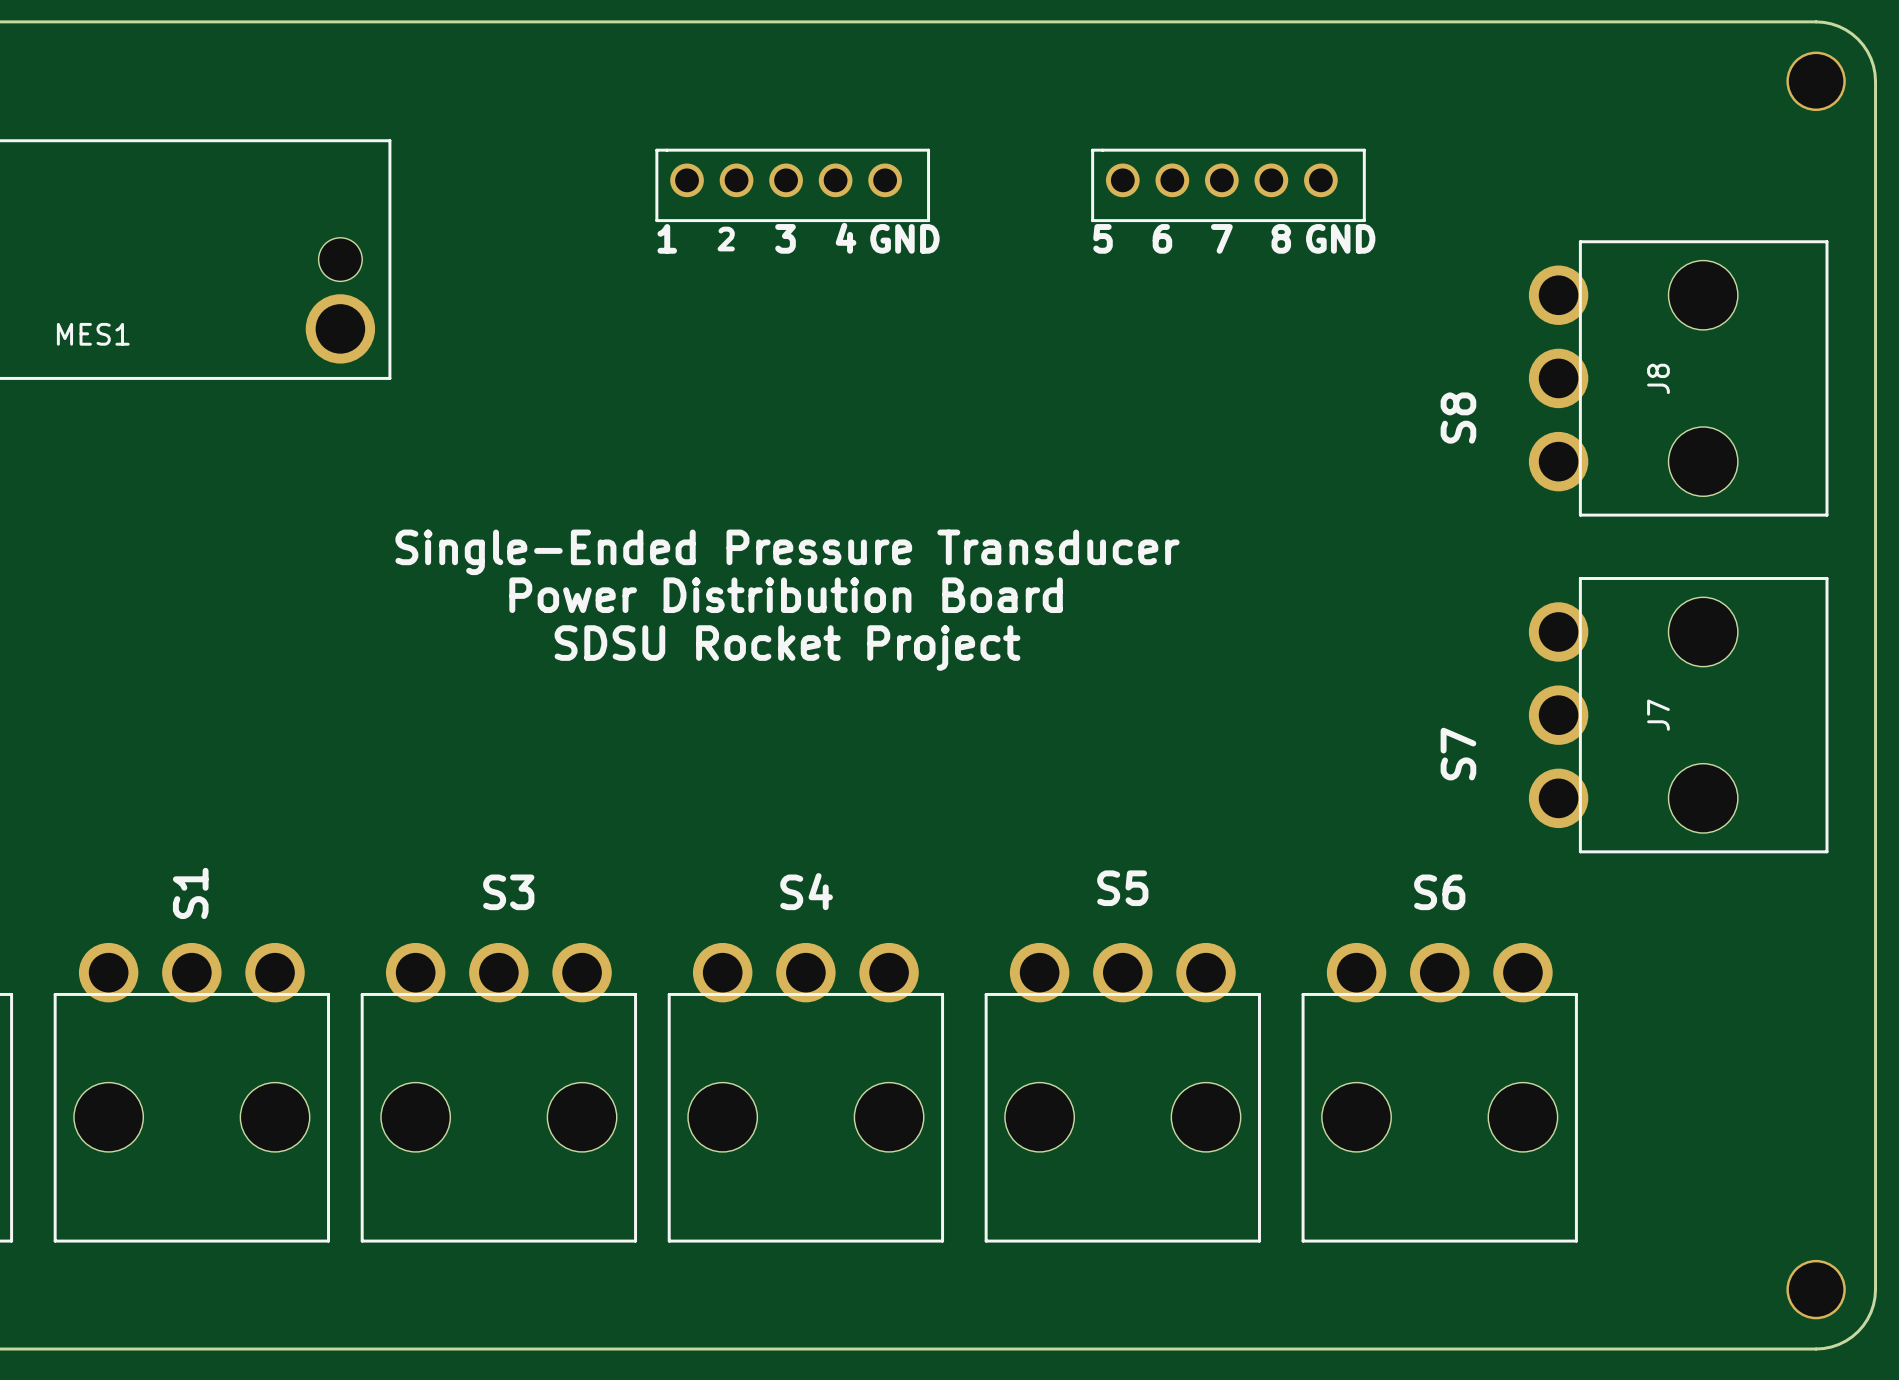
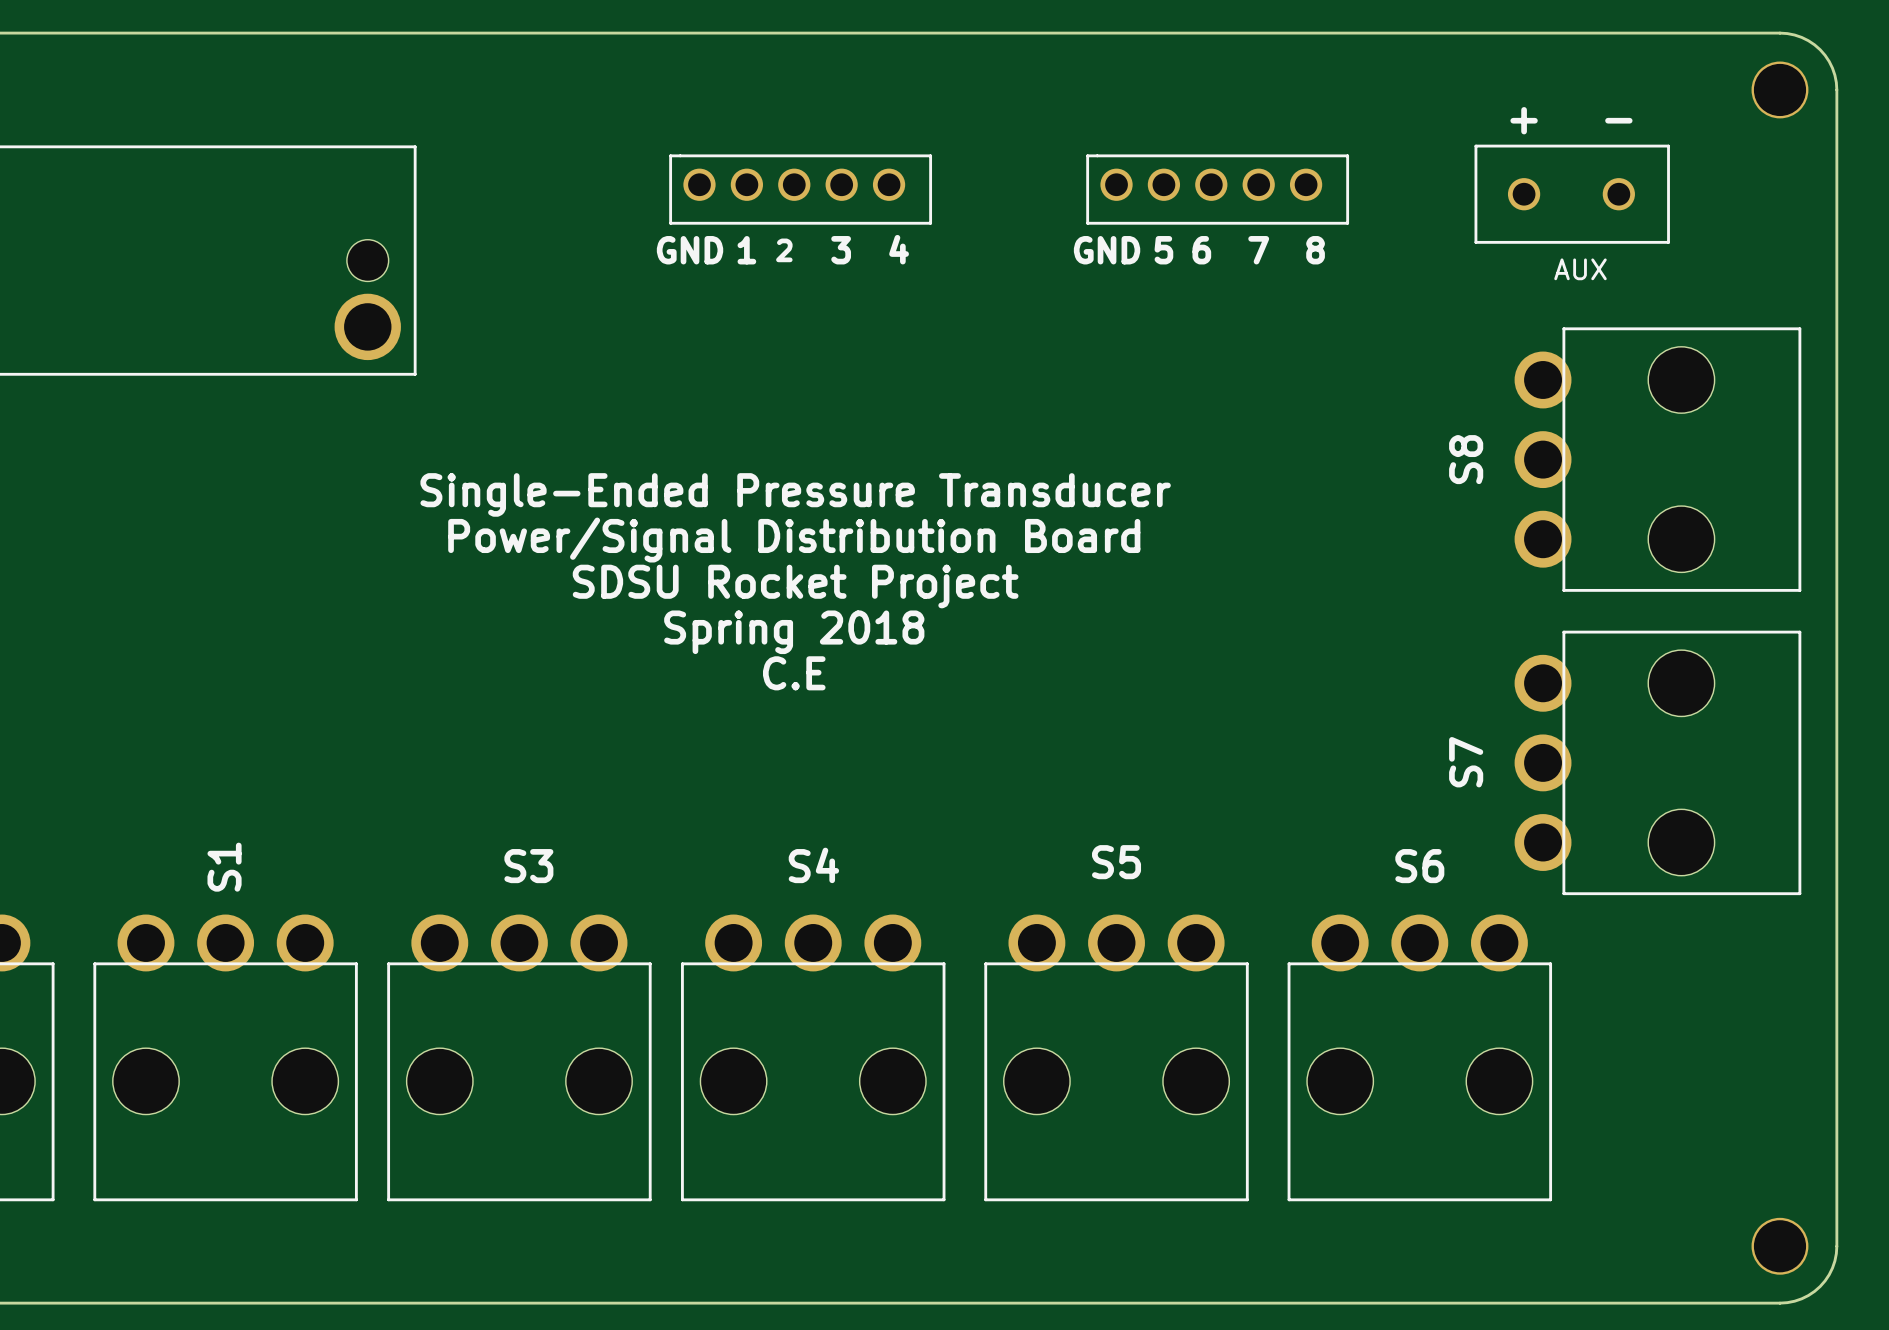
text: none -> + (1524, 120)
text: none -> - (1618, 120)
AUX: none -> (1572, 194)
text position: 1 (667, 238) -> 1 (746, 250)
text position: 3 (785, 238) -> 3 (841, 250)
text position: 4 (846, 238) -> 4 (899, 249)
text: GND (904, 238) -> none
text position: 5 (1103, 238) -> 5 (1163, 250)
text position: 6 (1162, 238) -> 6 (1201, 250)
text position: 7 (1221, 238) -> 7 (1258, 250)
text position: 8 (1281, 238) -> 8 (1315, 250)
text: GND (1340, 238) -> none
text position: 2 (726, 239) -> 2 (784, 250)
text: none -> GND (690, 250)
text: none -> GND (1107, 250)
MES1 name: MES1 (93, 334) -> none
J8: (1678, 378) -> none
text position: S8 (1458, 418) -> S8 (1466, 459)
part: none -> (1657, 459)
text: none -> Single-Ended Pressure Transducer (795, 494)
text: Single-Ended Pressure Transducer (787, 552) -> Power/Signal Distribution Board (794, 540)
text: Power Distribution Board (786, 595) -> SDSU Rocket Project (795, 586)
text: SDSU Rocket Project (787, 647) -> Spring 2018 (794, 632)
text: none -> C.E (794, 673)
J7: (1678, 715) -> none
text position: S7 (1458, 754) -> S7 (1466, 762)
part: none -> (1657, 762)

